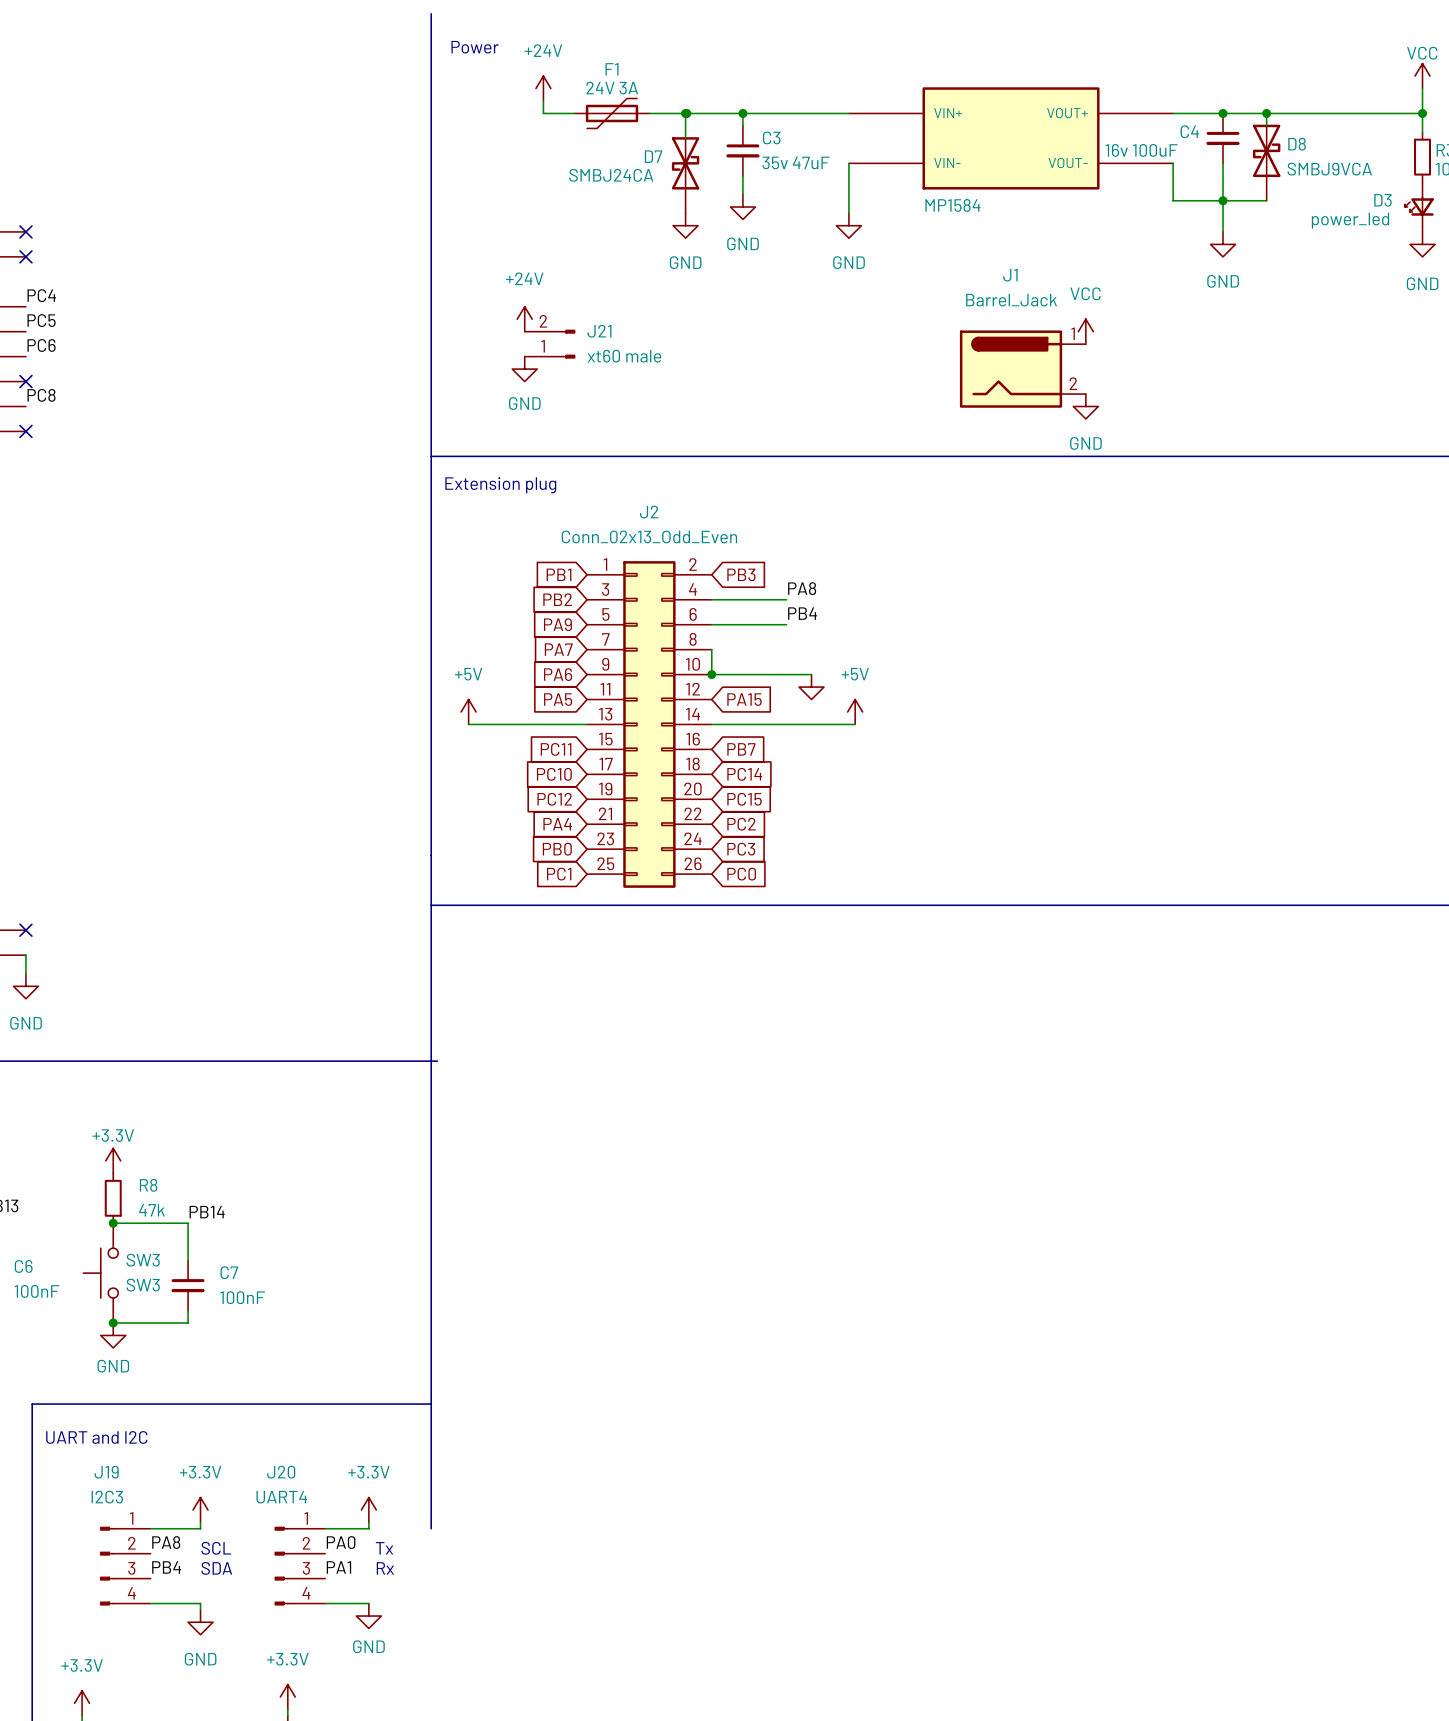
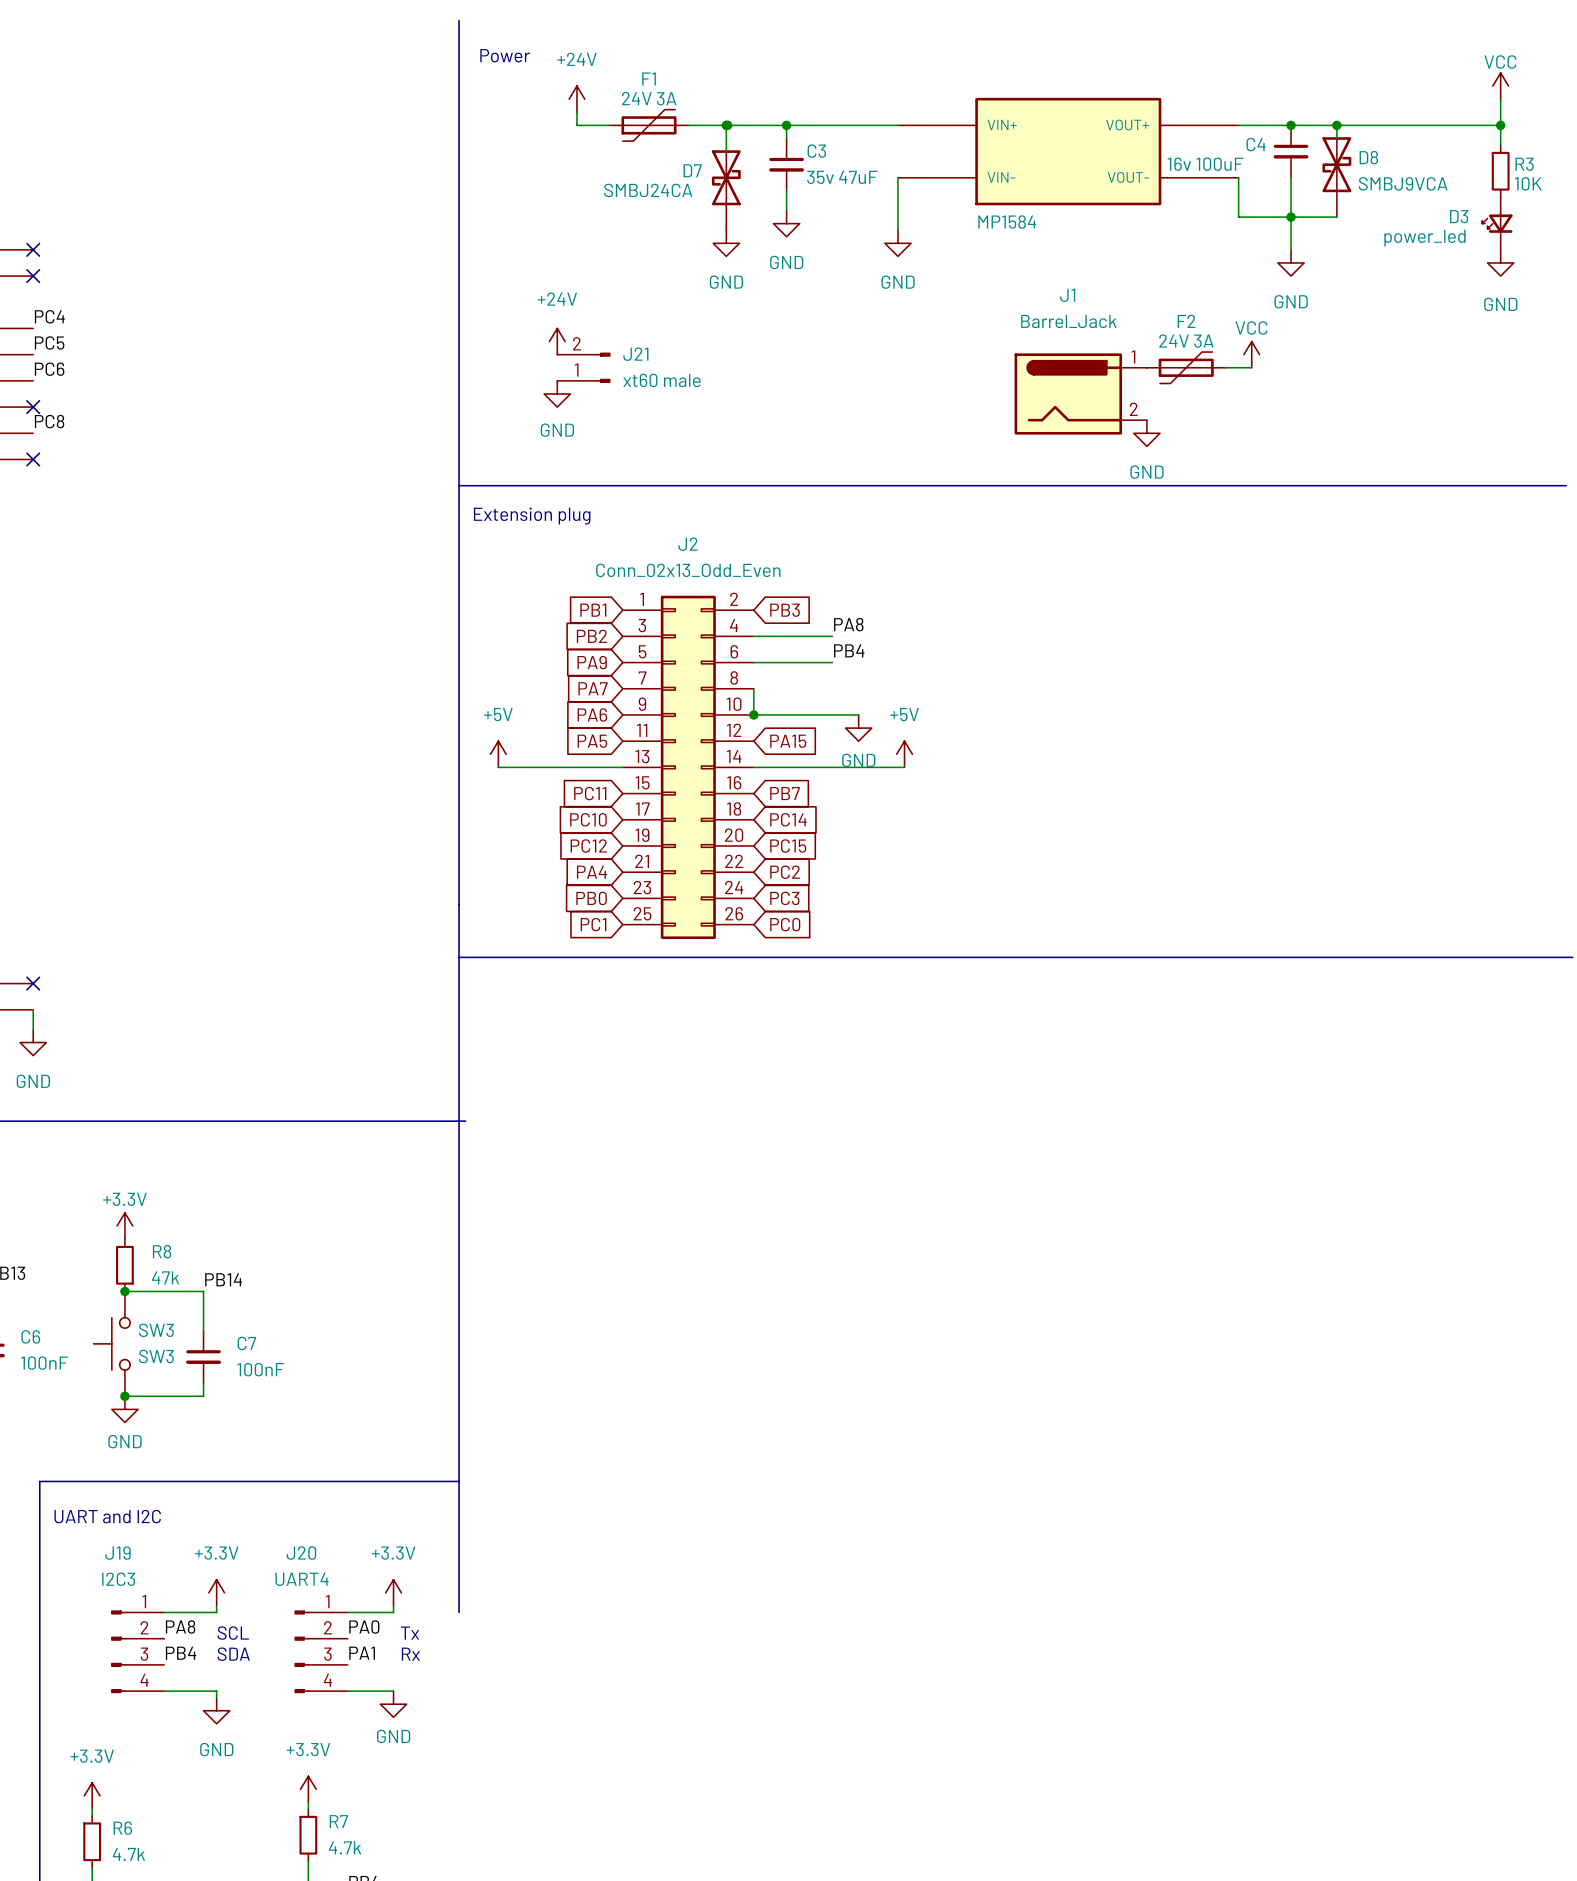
power symbol text position: VCC (1085, 293) -> VCC (1251, 327)
power symbol position: VCC (1085, 331) -> VCC (1251, 354)
F2: none -> 24V 3A (1186, 367)
wire: none -> (1225, 367) (1251, 367)
power symbol text: none -> GND (858, 760)

